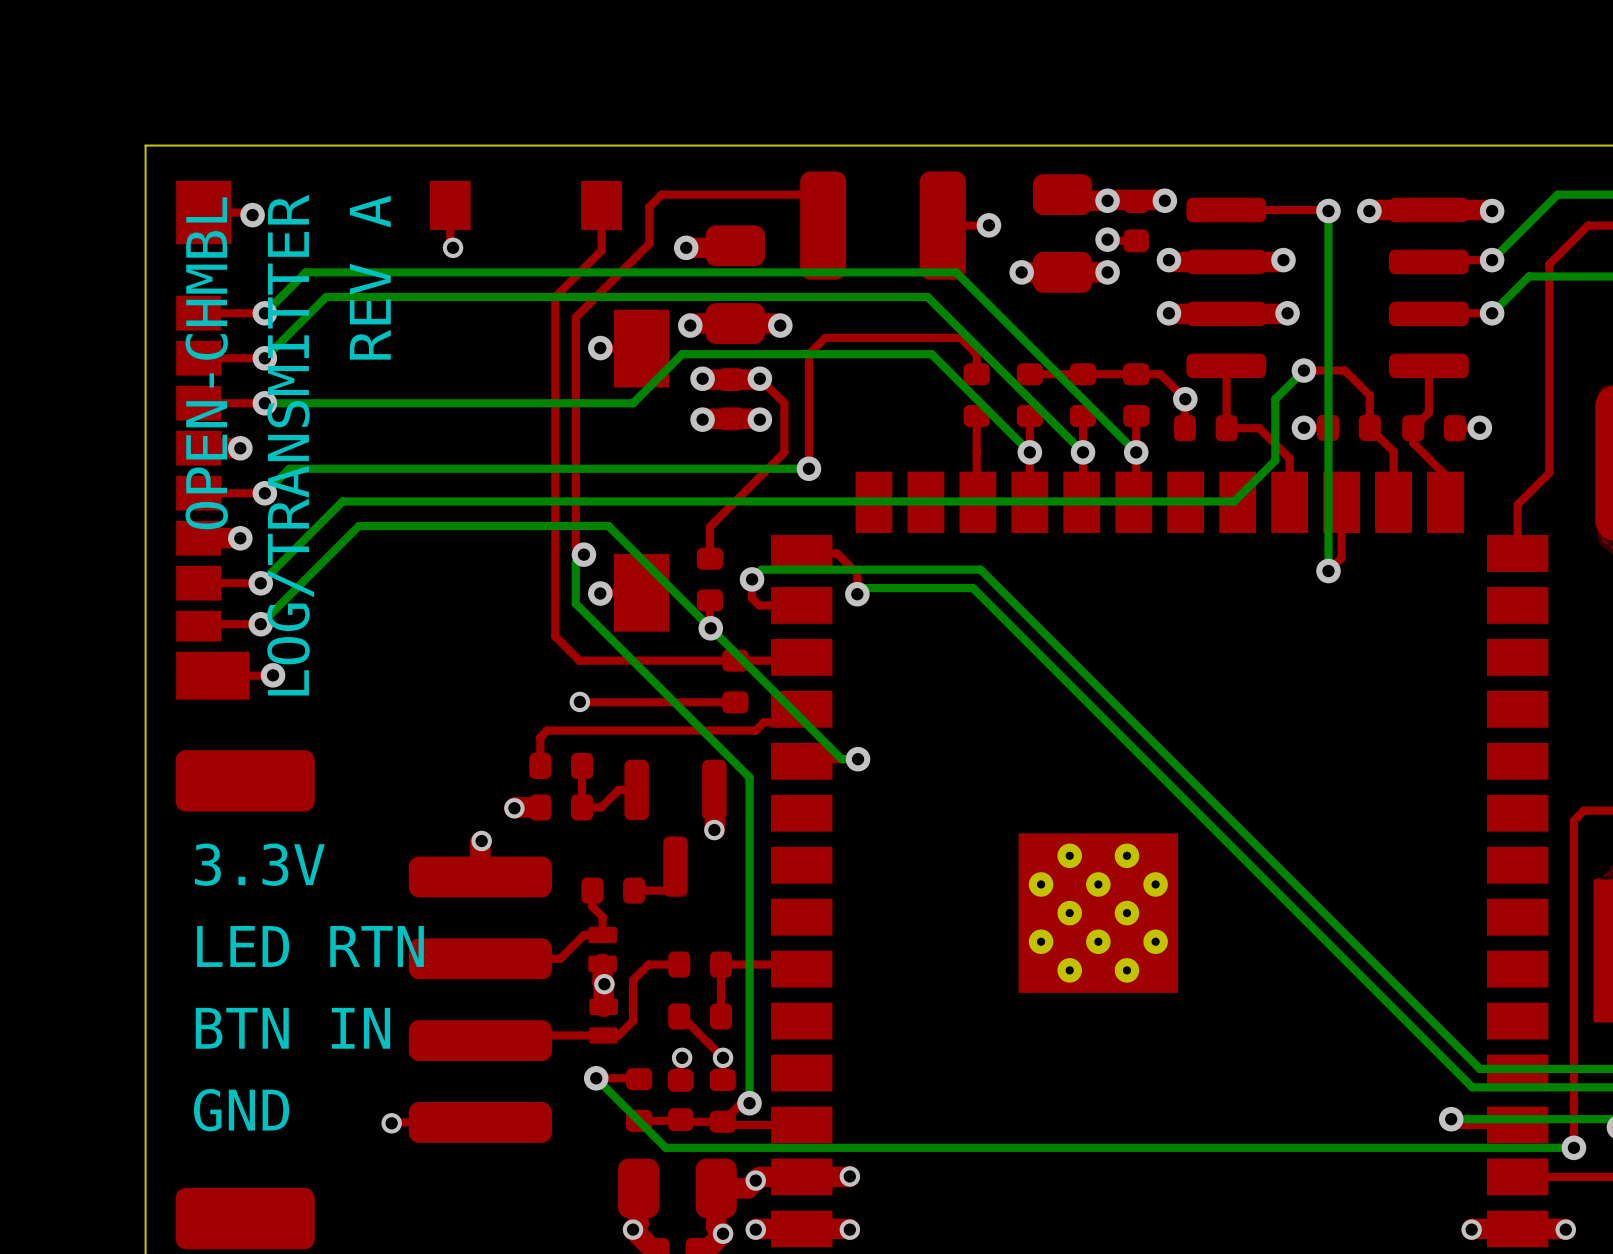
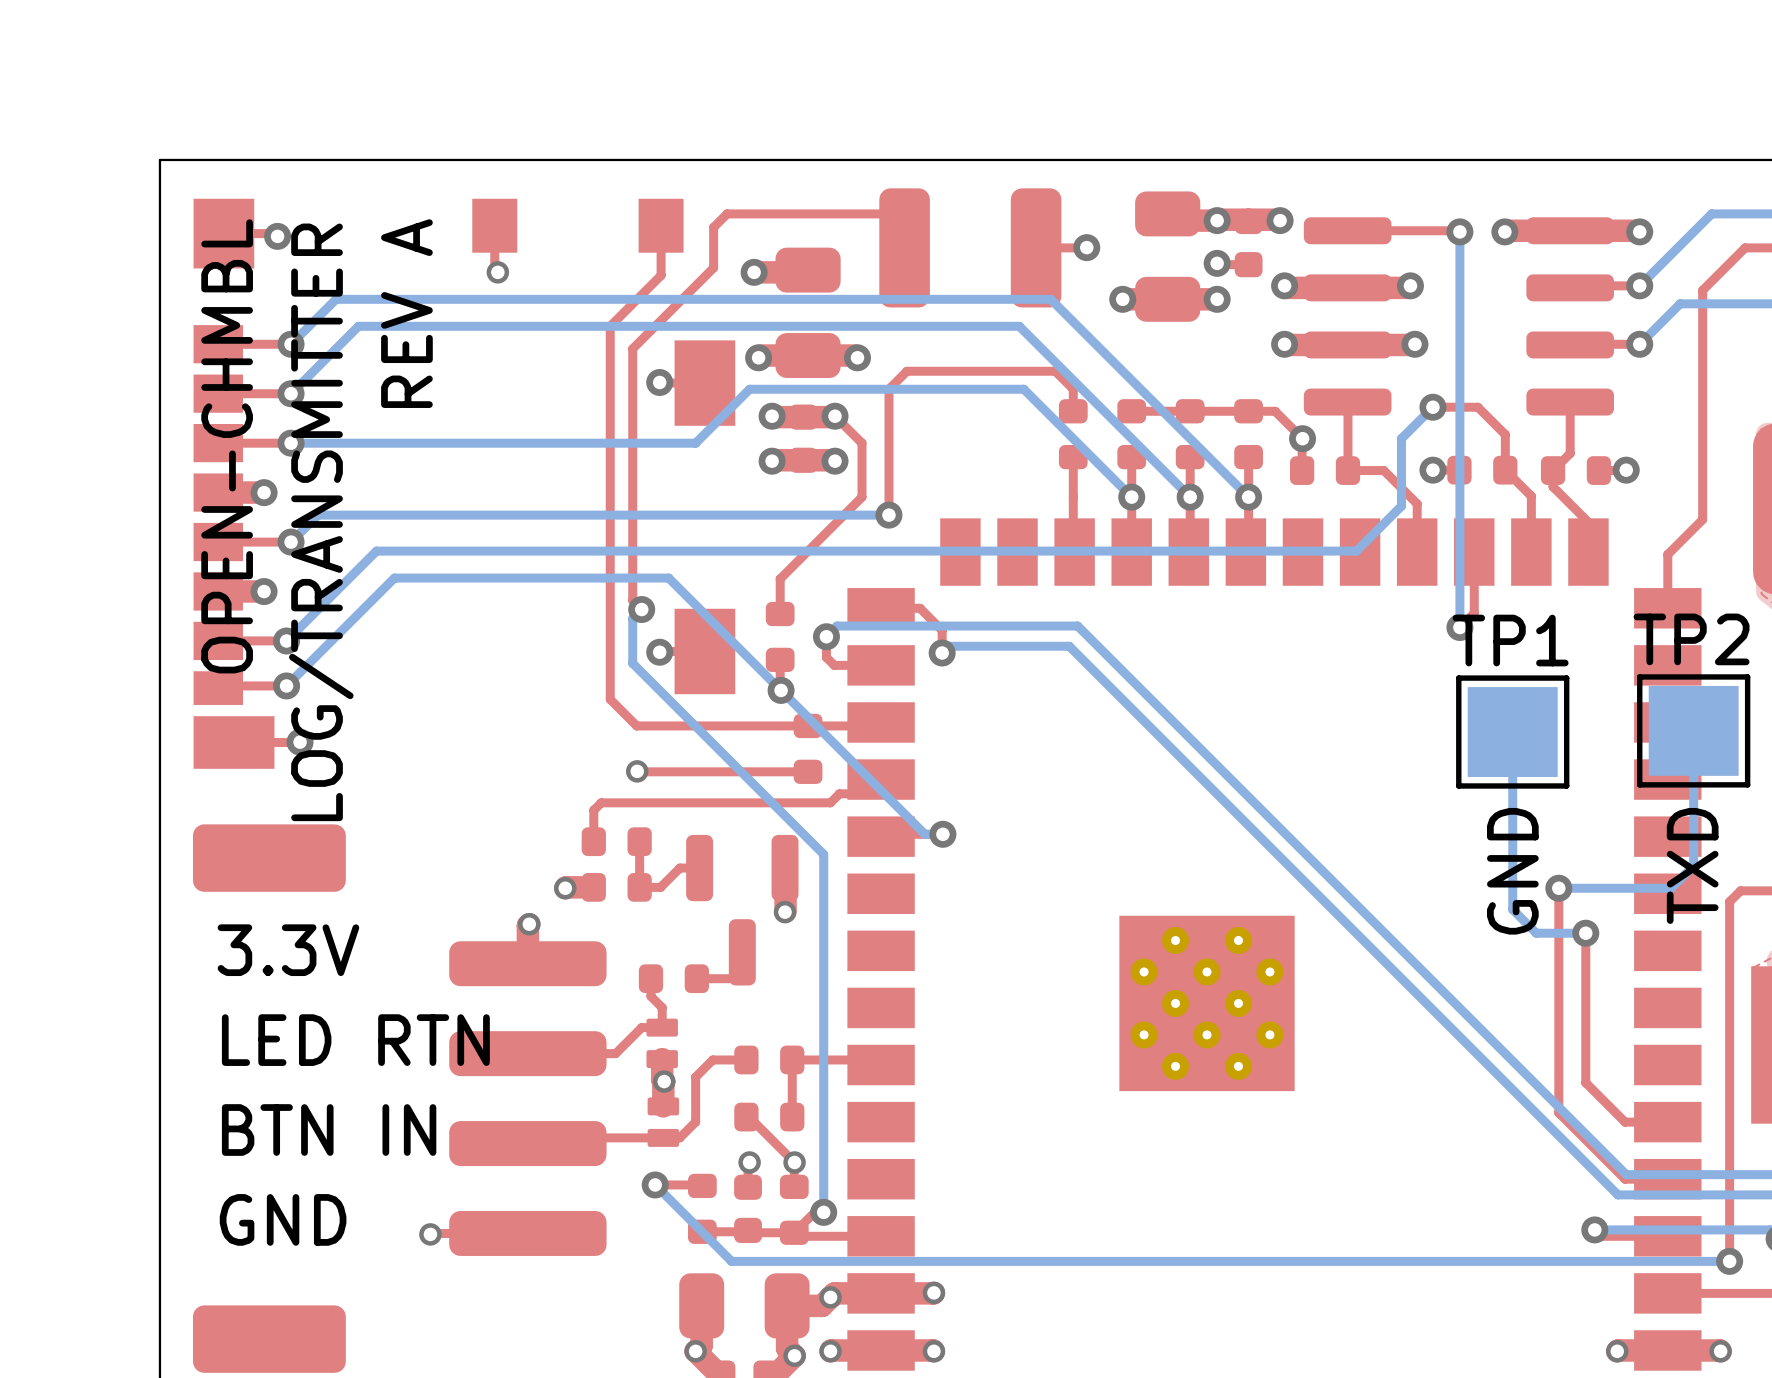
bottom track: none -> (1693, 730) (1693, 865) (1671, 888) (1558, 888)
TP2: none -> (1693, 730)
bottom track: none -> (1512, 732) (1512, 909) (1536, 933) (1585, 933)
TP1: none -> (1512, 732)
text: none -> GND (1512, 871)
text: none -> TXD (1692, 865)
top track: none -> (1558, 888) (1558, 1112) (1625, 1179) (1667, 1179)
via: none -> (1558, 888)
top track: none -> (1585, 933) (1585, 1082) (1625, 1122) (1667, 1122)
via: none -> (1585, 933)

